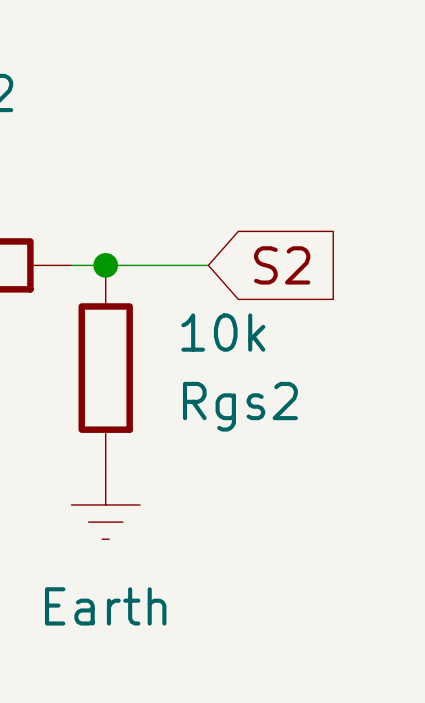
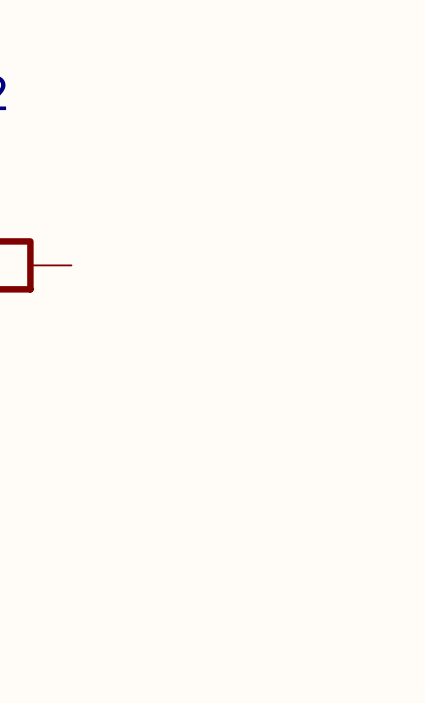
wire: (71, 265) (208, 265) -> none
junction: (105, 265) -> none
global label: S2 (282, 265) -> none
Rgs2: 10k (105, 368) -> none
power symbol: Earth (105, 504) -> none

